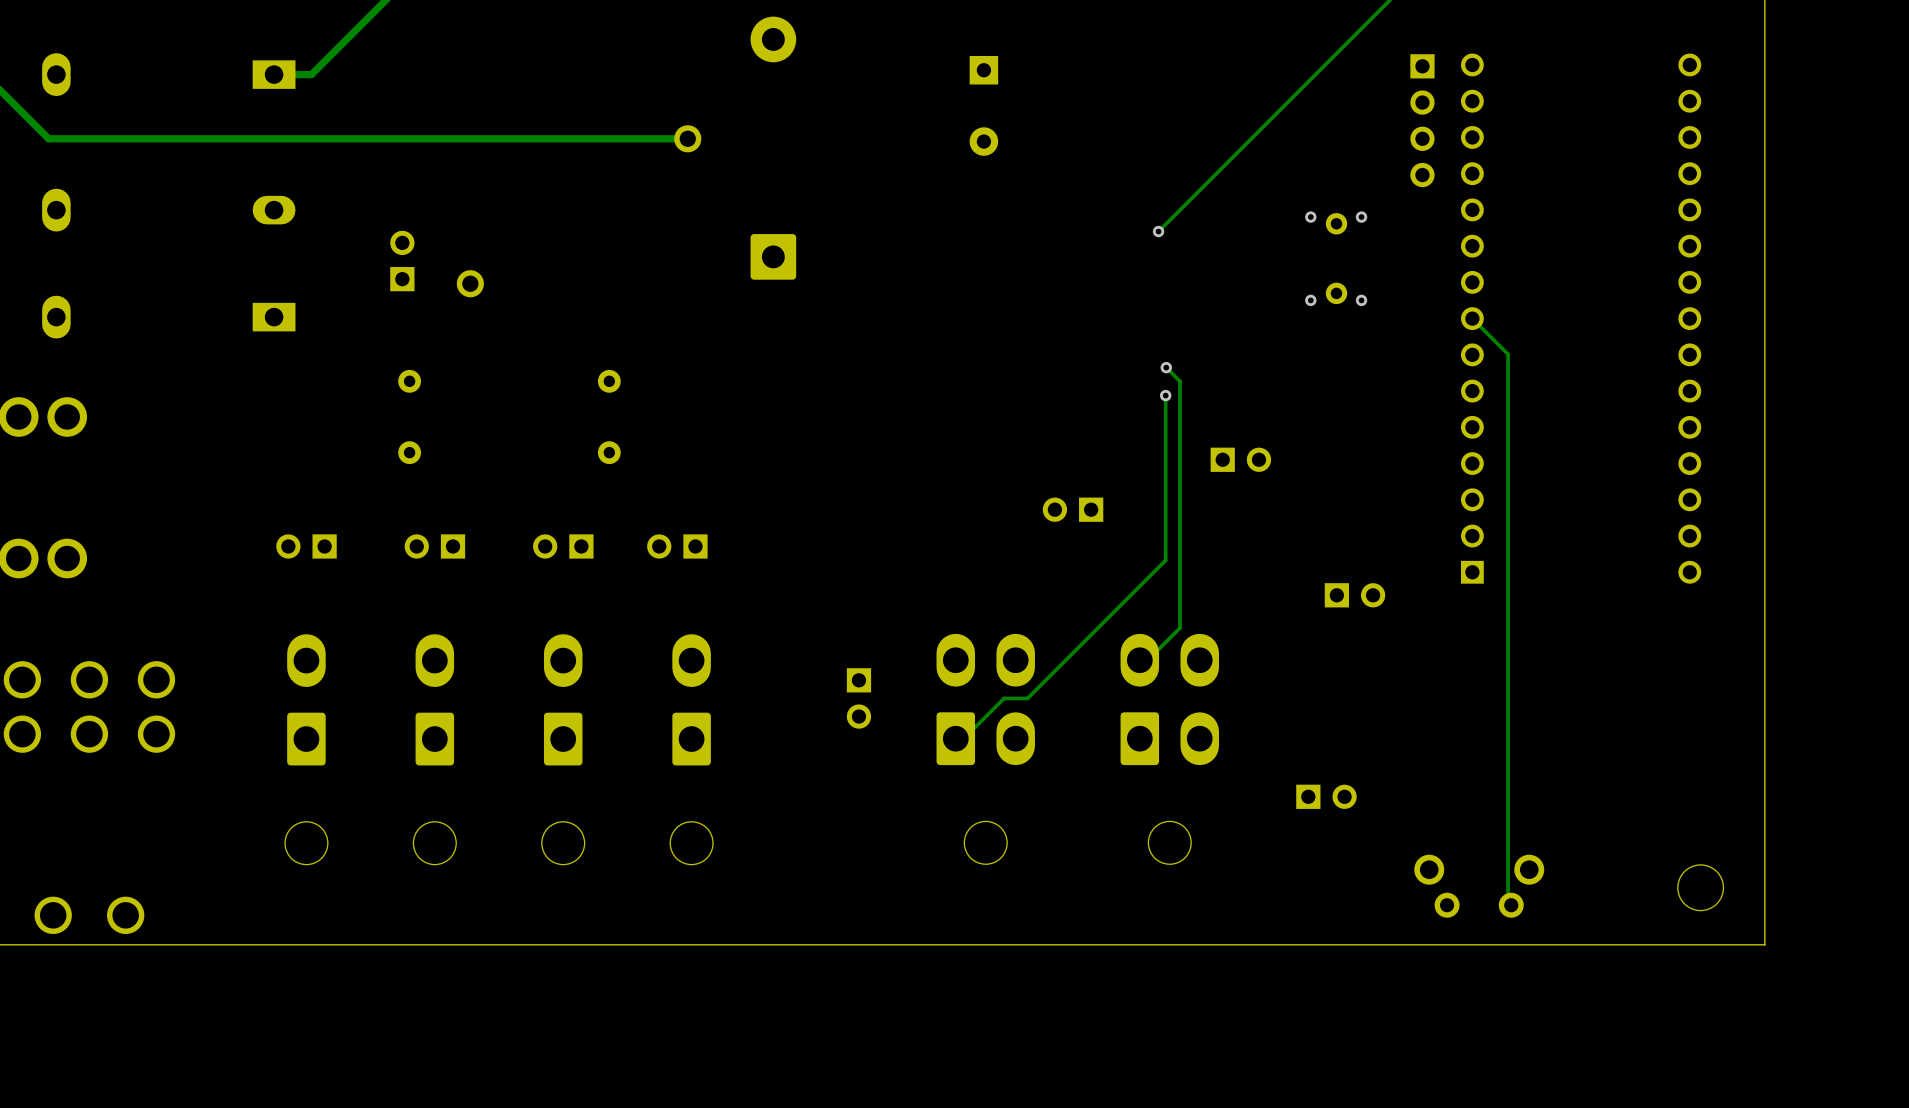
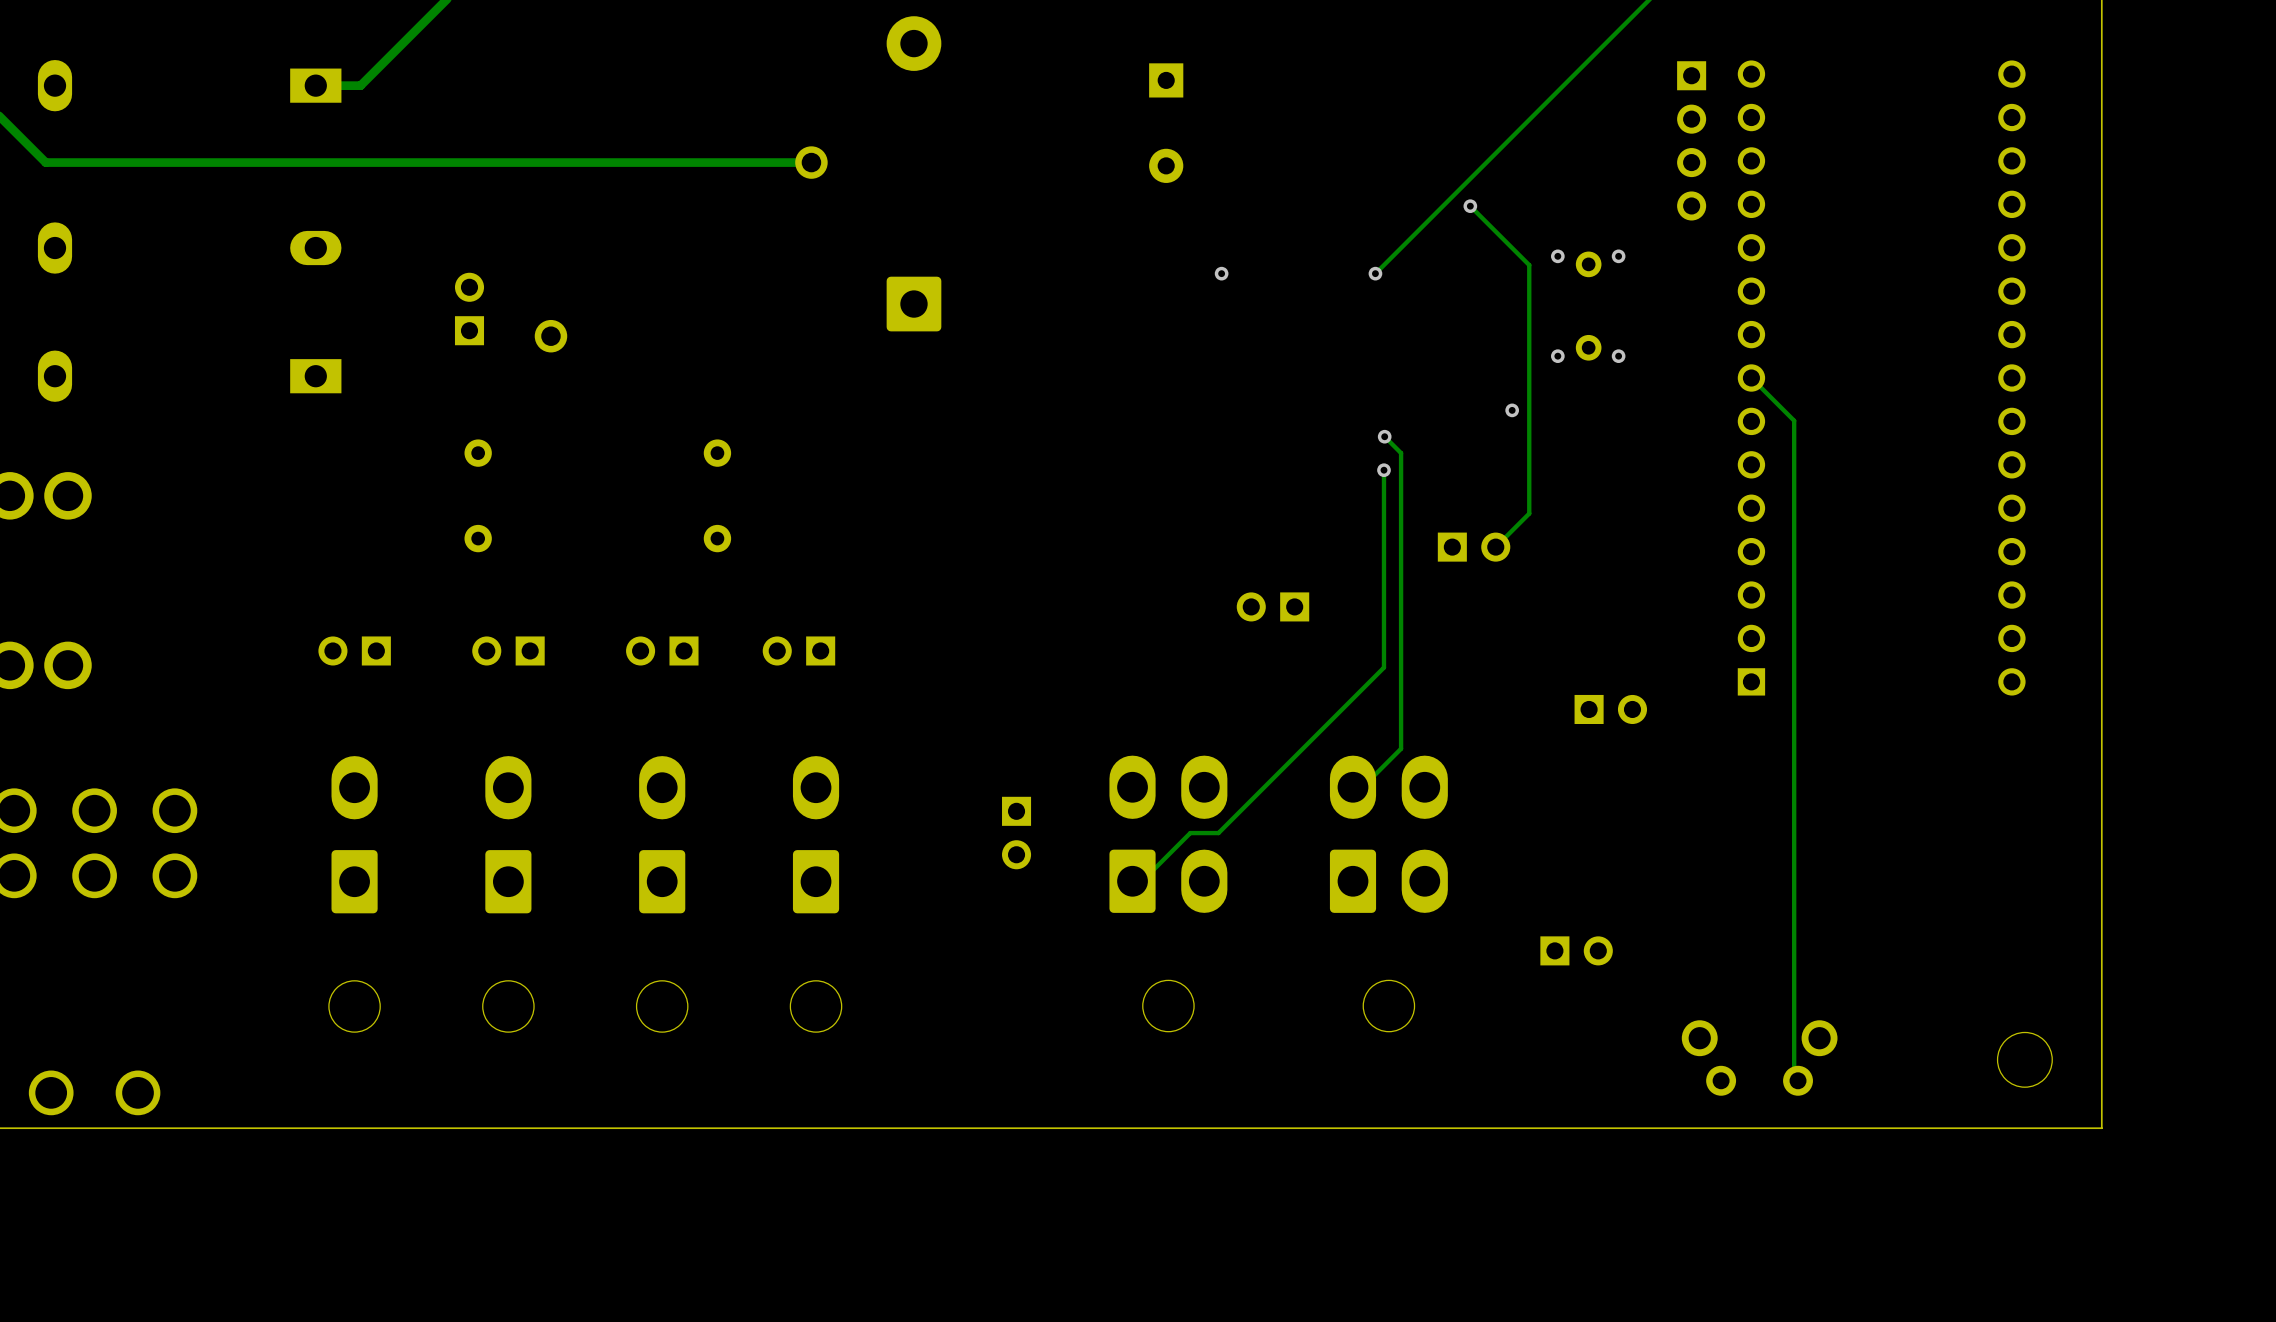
track: none -> (1470, 206) (1529, 265) (1529, 513) (1495, 547)
via: none -> (1470, 206)
via: none -> (1221, 273)
via: none -> (1512, 410)

